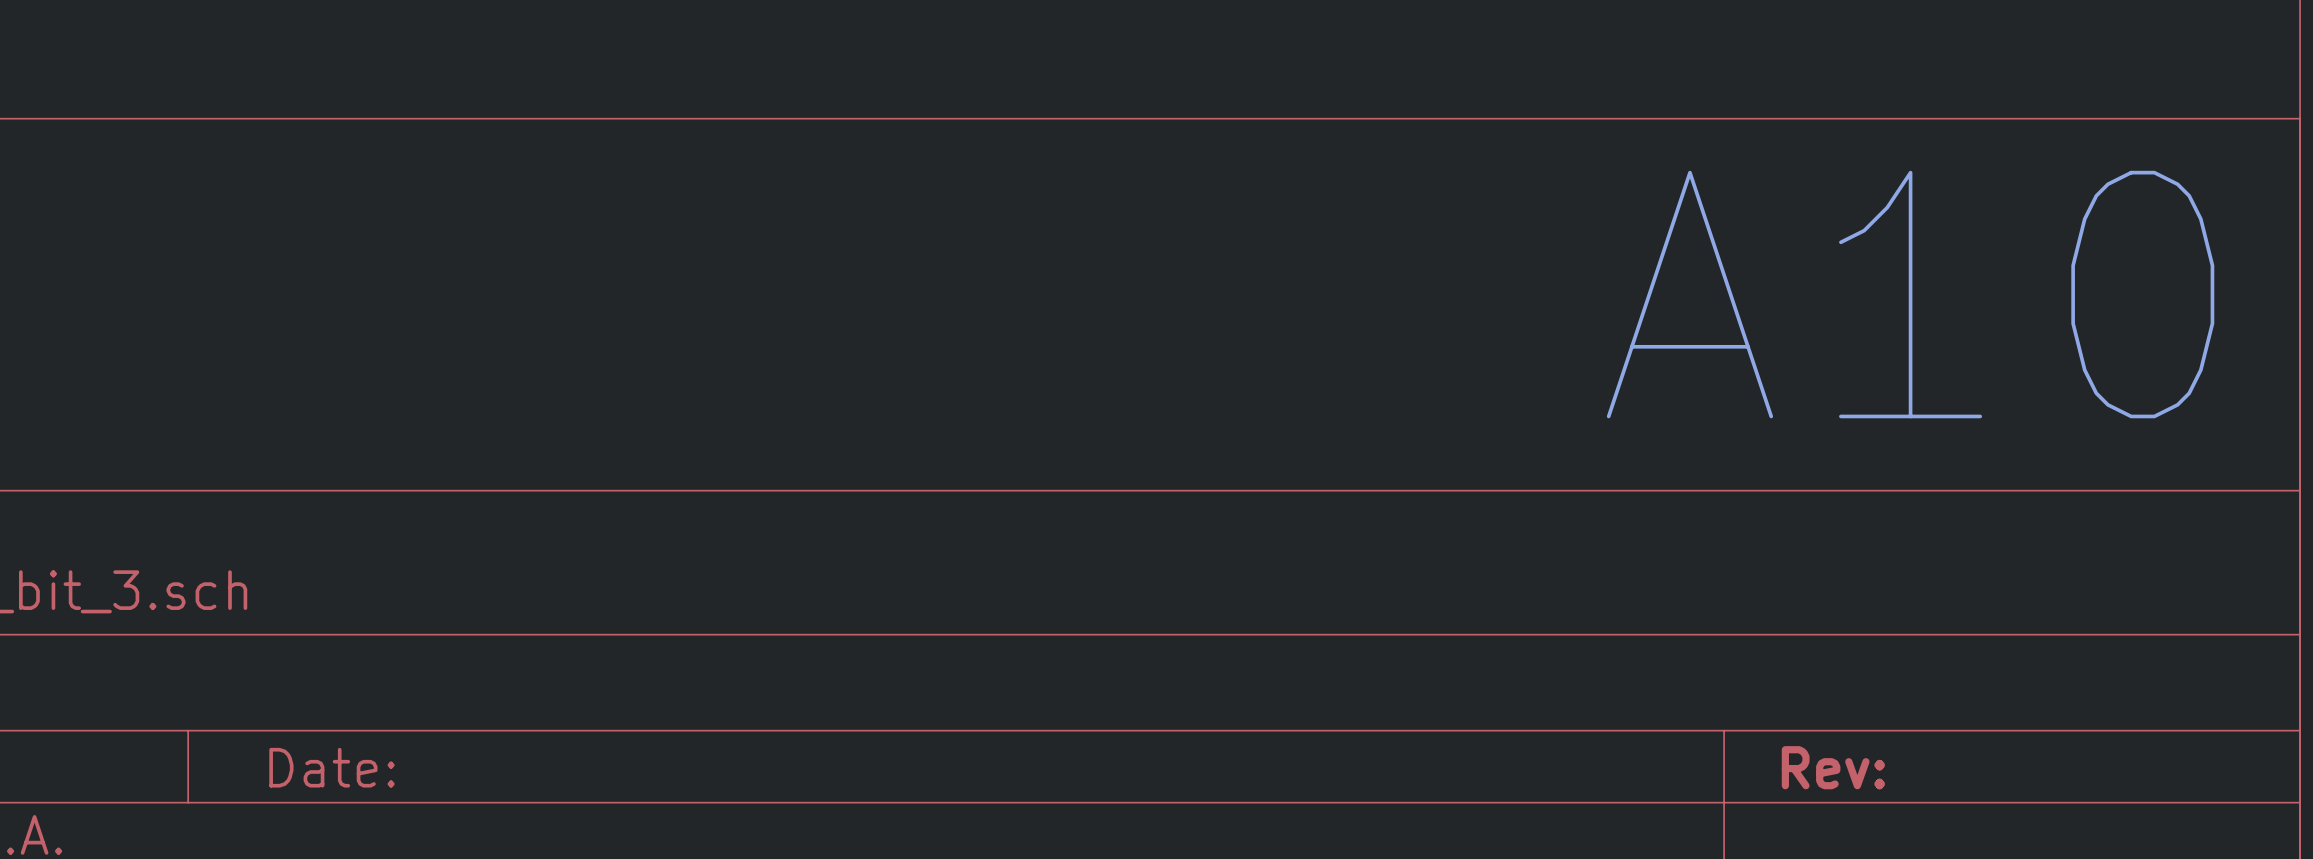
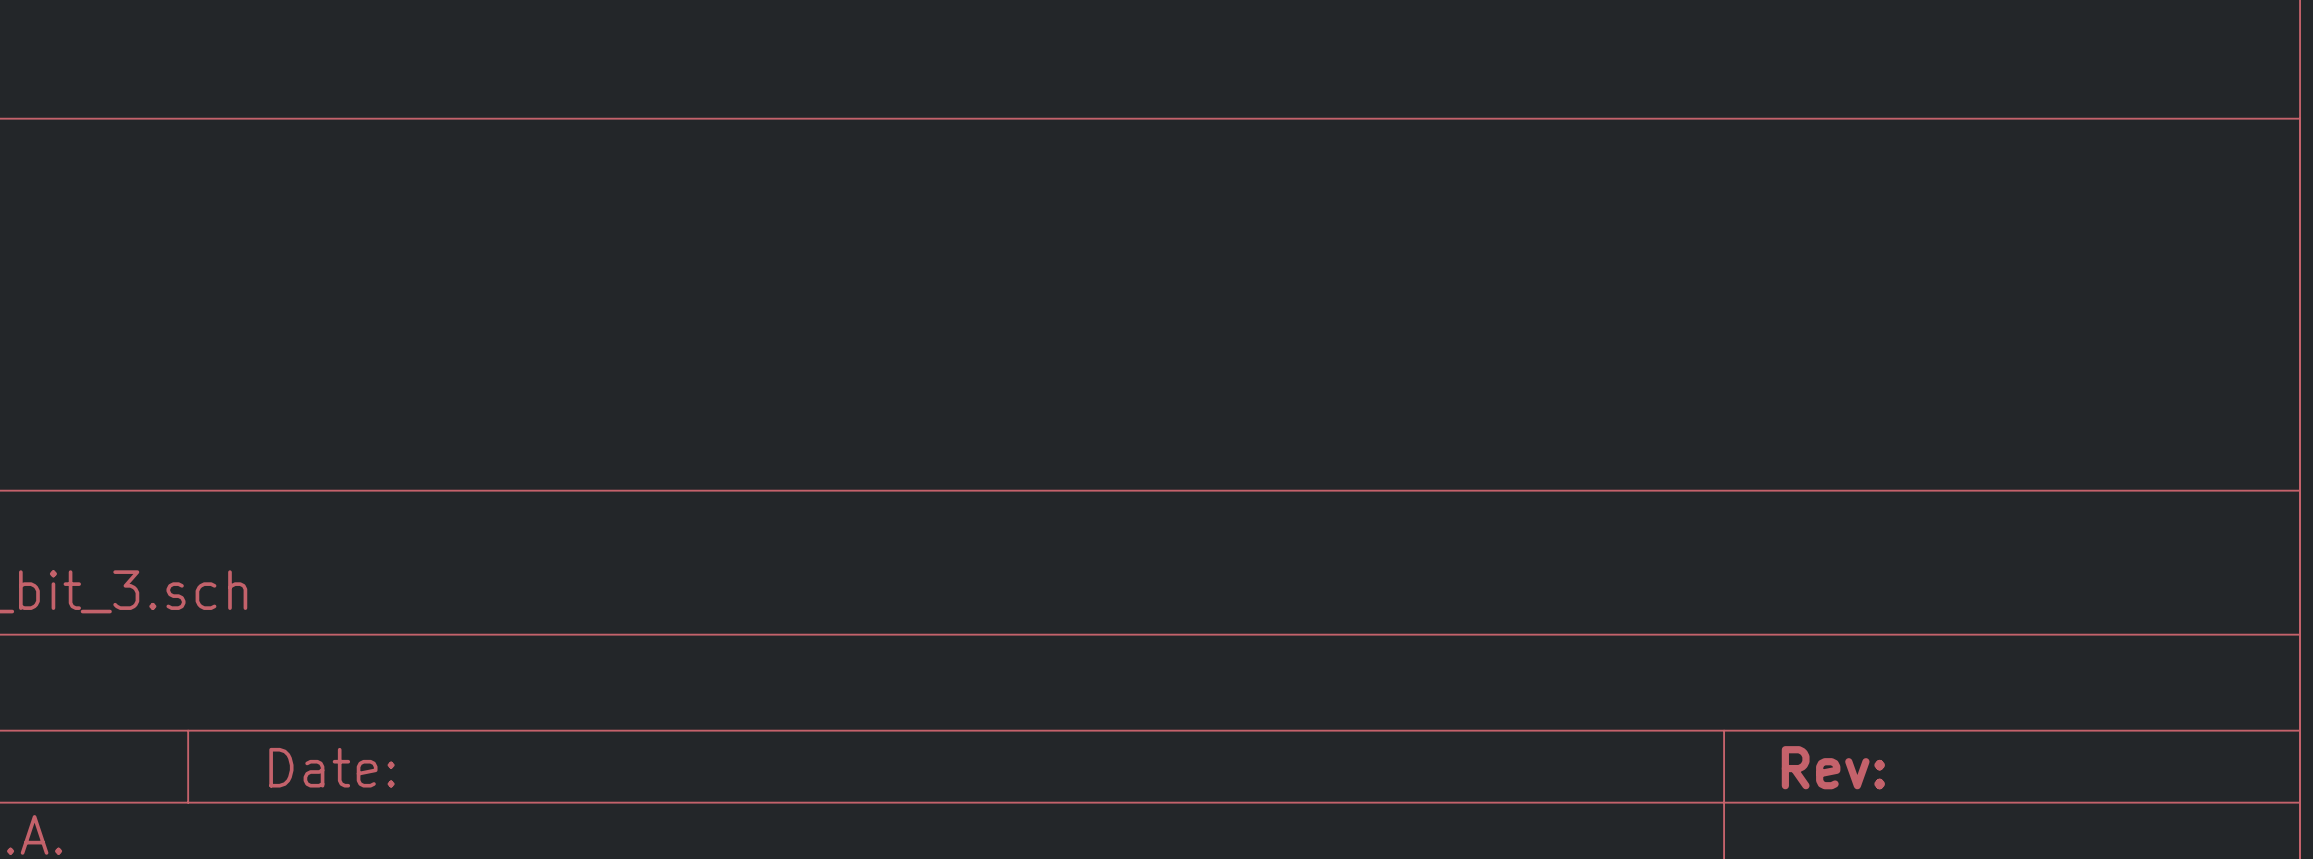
text: A10 (1910, 294) -> none

